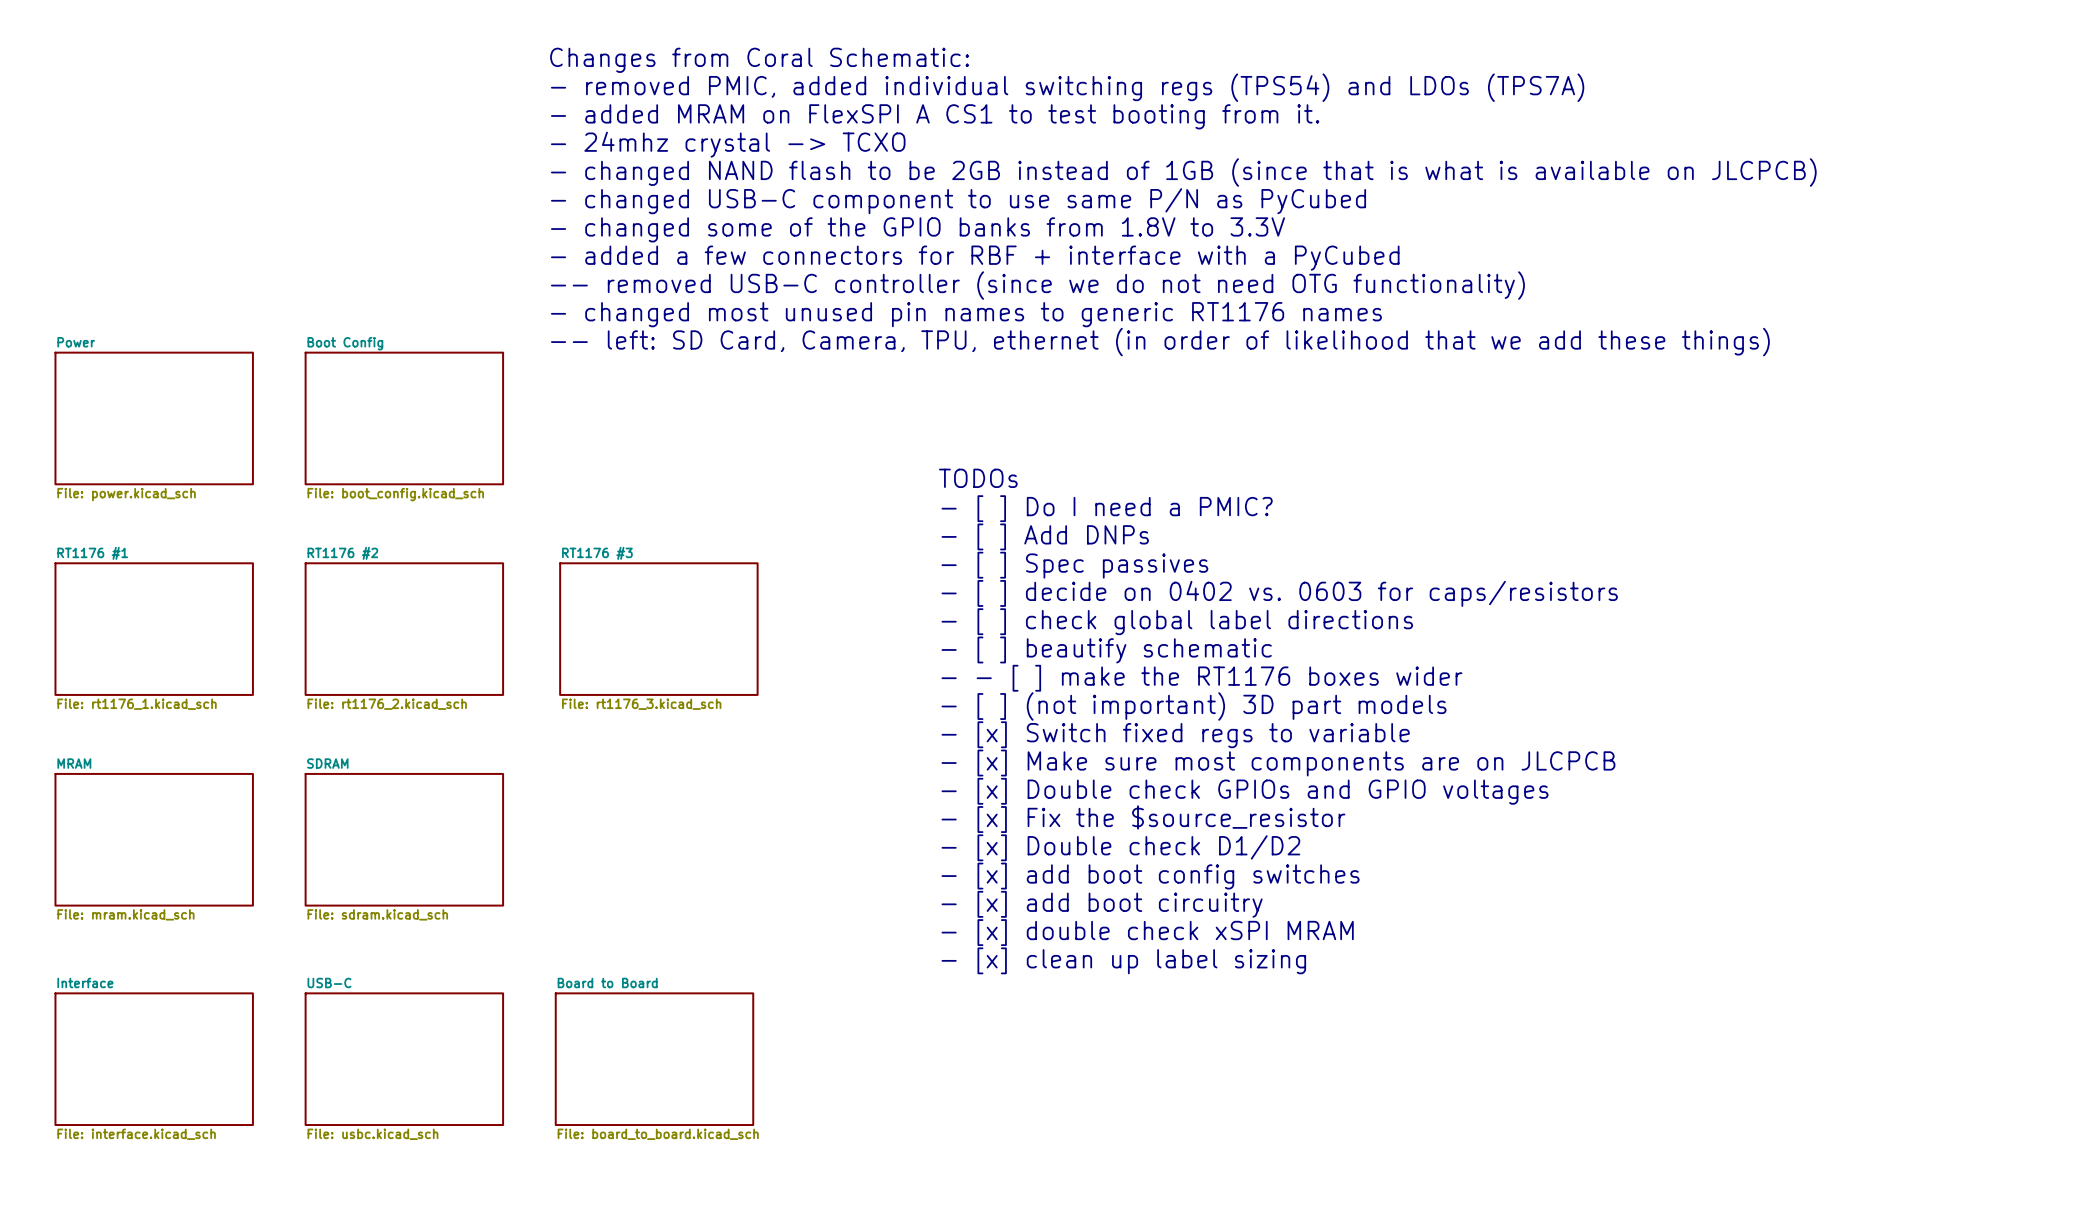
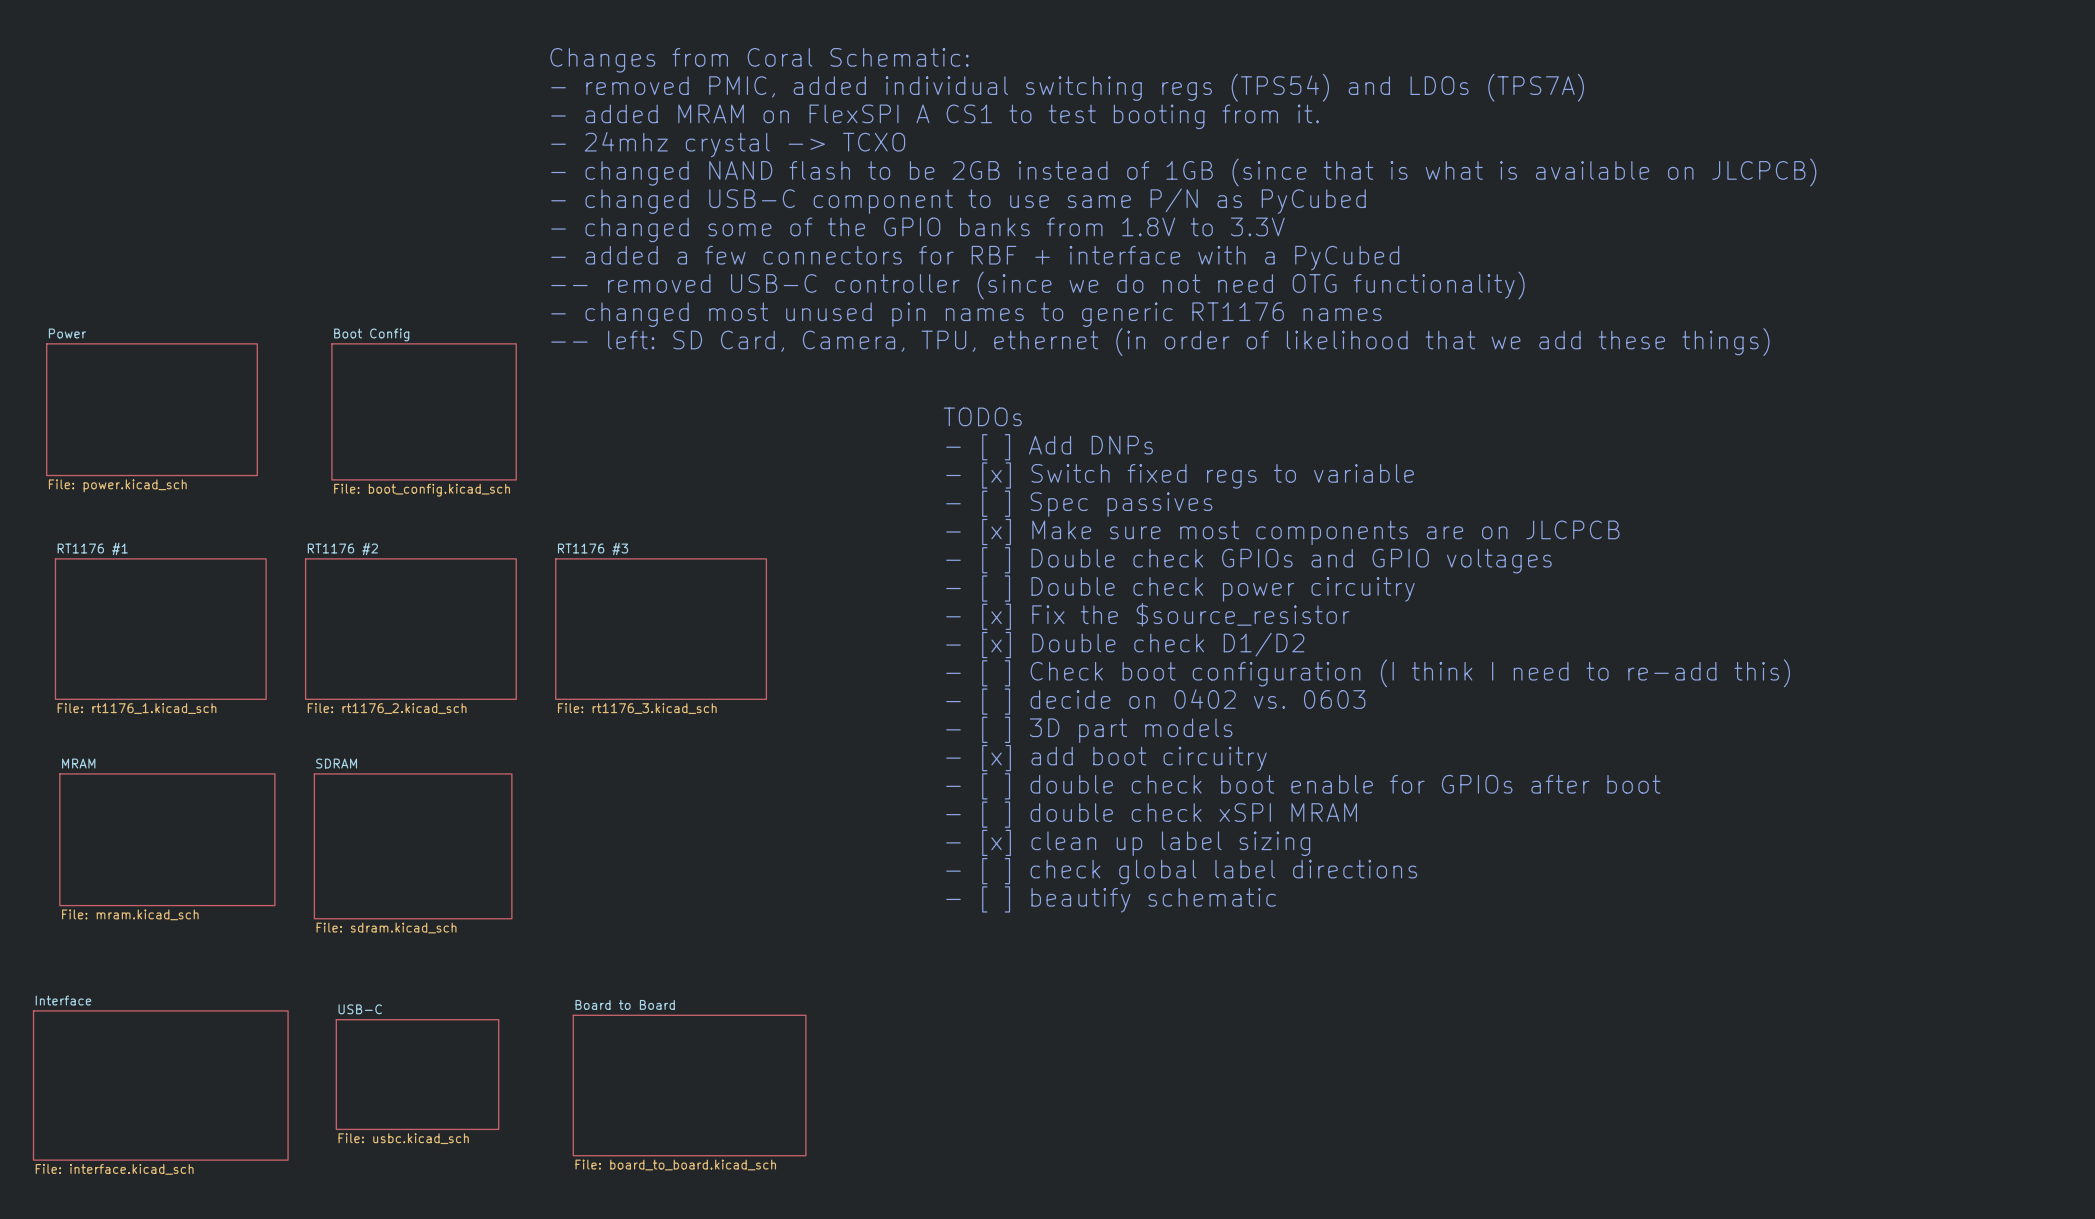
sheet Power: none -> File: power.kicad_sch (152, 409)
sheet Boot Config: none -> File: boot_config.kicad_sch (424, 411)
sheet Power: File: power.kicad_sch (154, 418) -> none
sheet Boot Config: File: boot_config.kicad_sch (404, 418) -> none
text: none -> - [x] Switch fixed regs to variable (1180, 475)
text position: TODOs (978, 478) -> TODOs (982, 416)
text: - [ ] Do I need a PMIC? (1107, 508) -> none
text: none -> - [x] Make sure most components are on JLCPCB (1282, 532)
text position: - [ ] Add DNPs (1045, 536) -> - [ ] Add DNPs (1049, 447)
text: none -> - [ ] Double check GPIOs and GPIO voltages (1248, 560)
sheet RT1176 #1 shape: [54, 562, 254, 696] -> [54, 558, 267, 700]
sheet RT1176 #2 shape: [305, 562, 504, 696] -> [305, 558, 517, 700]
sheet RT1176 #3 shape: [559, 562, 759, 696] -> [555, 558, 767, 700]
text position: - [ ] Spec passives (1074, 565) -> - [ ] Spec passives (1079, 503)
text: - [ ] decide on 0402 vs. 0603 for caps/resistors (1279, 593) -> - [ ] Double check power circuitry (1180, 588)
text: - [ ] check global label directions (1177, 621) -> - [x] Fix the $source_resistor (1147, 616)
text: - [ ] beautify schematic (1106, 649) -> - [x] Double check D1/D2 (1125, 645)
text: - - [ ] make the RT1176 boxes wider (1201, 678) -> - [ ] Check boot configuration (I think I need to re-add this) (1368, 673)
text: - [ ] (not important) 3D part models (1194, 706) -> - [ ] decide on 0402 vs. 0603 (1155, 701)
text: - [x] Switch fixed regs to variable (1175, 734) -> - [ ] 3D part models (1089, 729)
text: - [x] Make sure most components are on JLCPCB (1278, 763) -> none
text: - [x] Double check GPIOs and GPIO voltages (1245, 791) -> - [ ] double check boot enable for GPIOs after boot (1303, 786)
text: - [x] Fix the $source_resistor (1143, 819) -> - [ ] double check xSPI MRAM (1151, 814)
sheet MRAM: File: mram.kicad_sch (154, 839) -> none
sheet MRAM: none -> File: mram.kicad_sch (167, 839)
sheet SDRAM: File: sdram.kicad_sch (404, 839) -> none
sheet SDRAM: none -> File: sdram.kicad_sch (413, 846)
text: - [x] Double check D1/D2 (1120, 847) -> none
text: - [x] add boot config switches (1150, 876) -> - [ ] check global label directions (1181, 871)
text: none -> - [ ] beautify schematic (1111, 899)
text position: - [x] add boot circuitry (1102, 904) -> - [x] add boot circuitry (1106, 758)
text: - [x] double check xSPI MRAM (1147, 932) -> none
text position: - [x] clean up label sizing (1123, 960) -> - [x] clean up label sizing (1128, 842)
sheet Interface: File: interface.kicad_sch (154, 1059) -> none
sheet USB-C: File: usbc.kicad_sch (404, 1059) -> none
sheet Board to Board: File: board_to_board.kicad_sch (654, 1059) -> none
sheet USB-C: none -> File: usbc.kicad_sch (417, 1074)
sheet Interface: none -> File: interface.kicad_sch (160, 1085)
sheet Board to Board: none -> File: board_to_board.kicad_sch (689, 1085)

